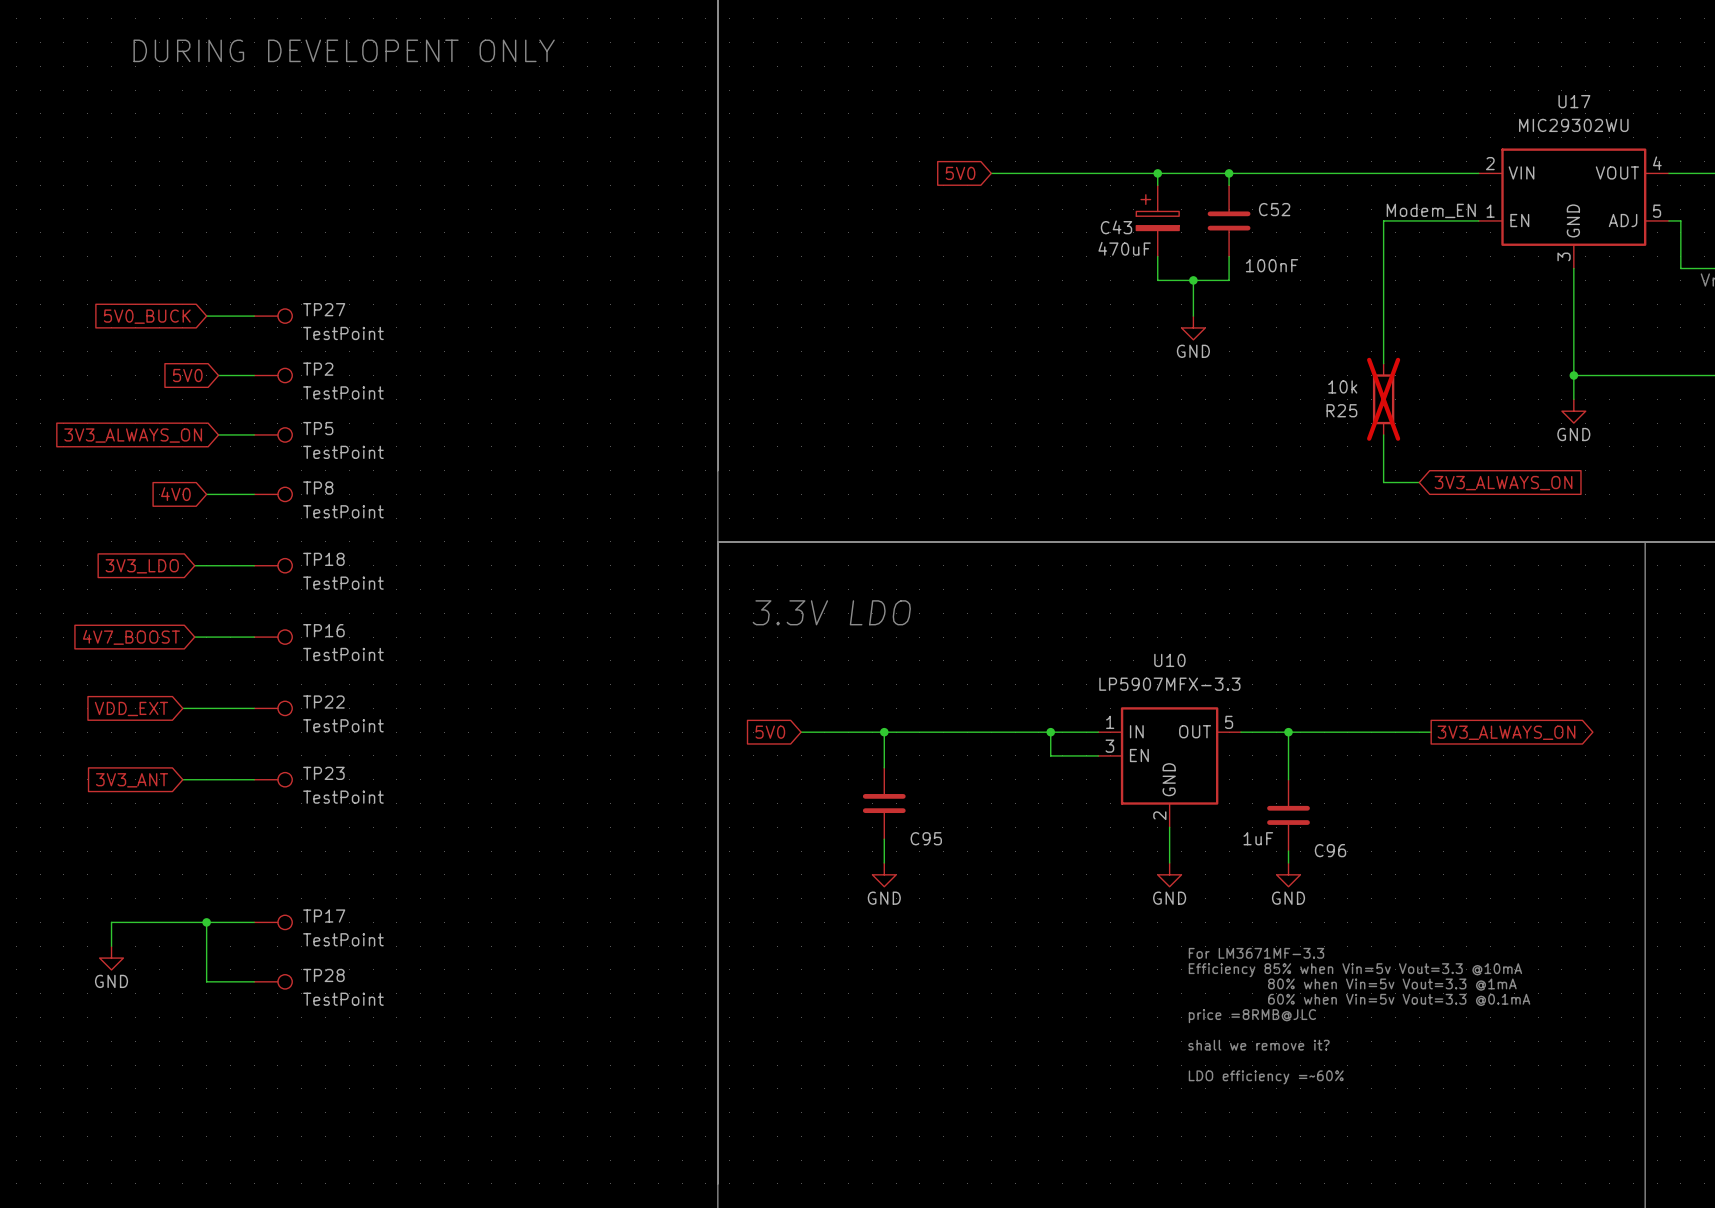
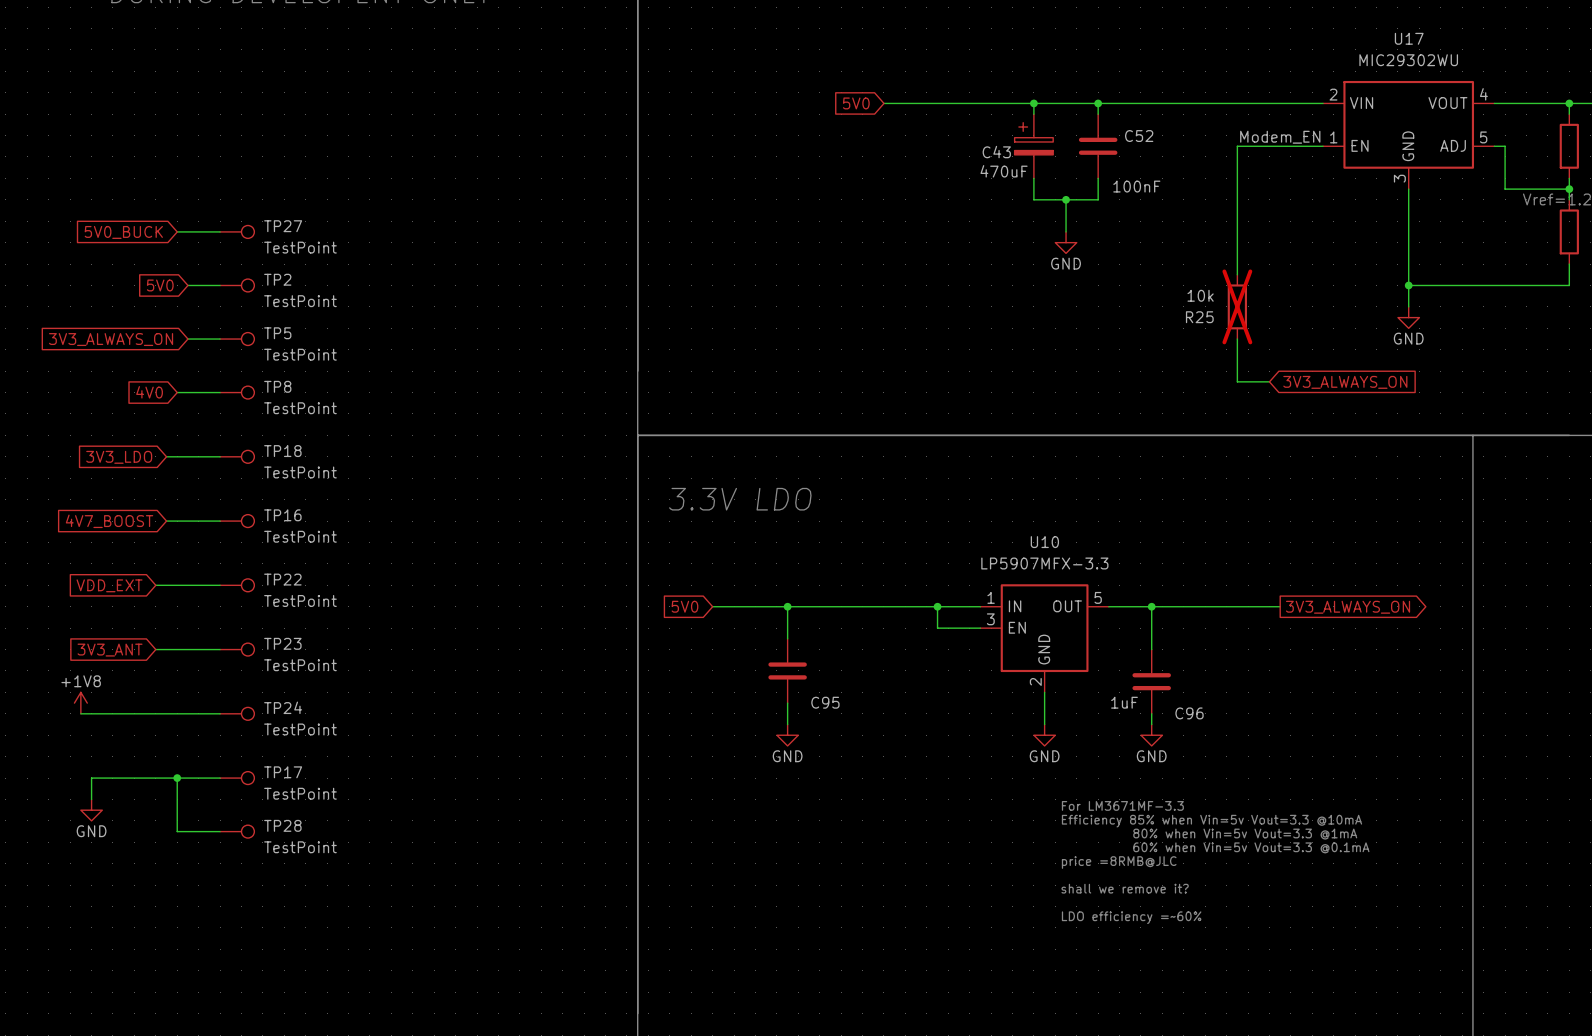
power symbol: none -> +1V8 (80, 703)
wire: none -> (80, 713) (220, 713)
TP24: none -> TestPoint (237, 713)

